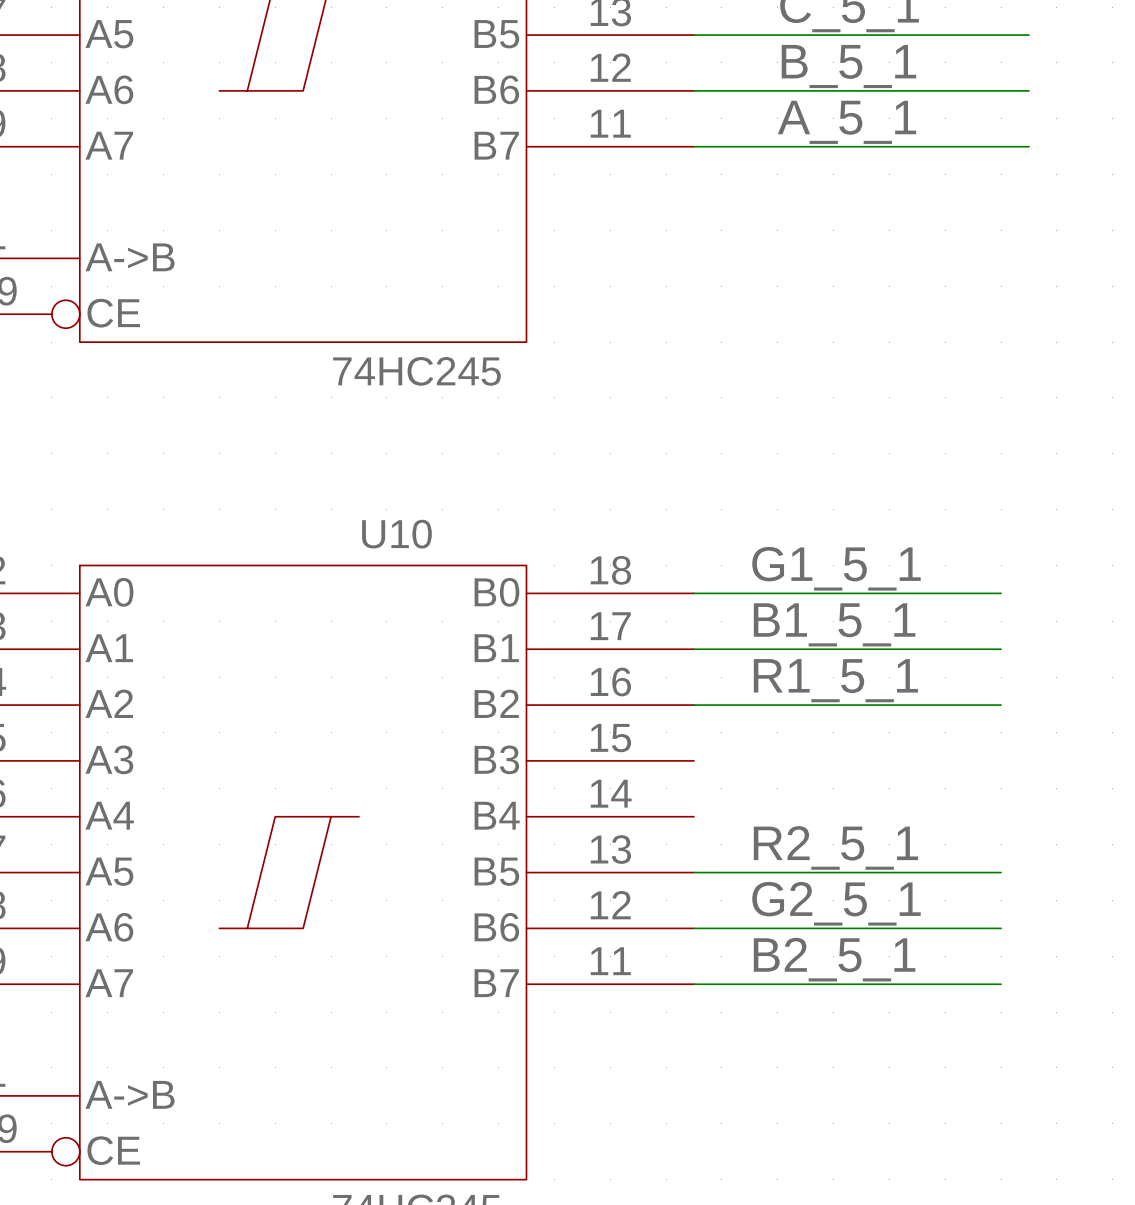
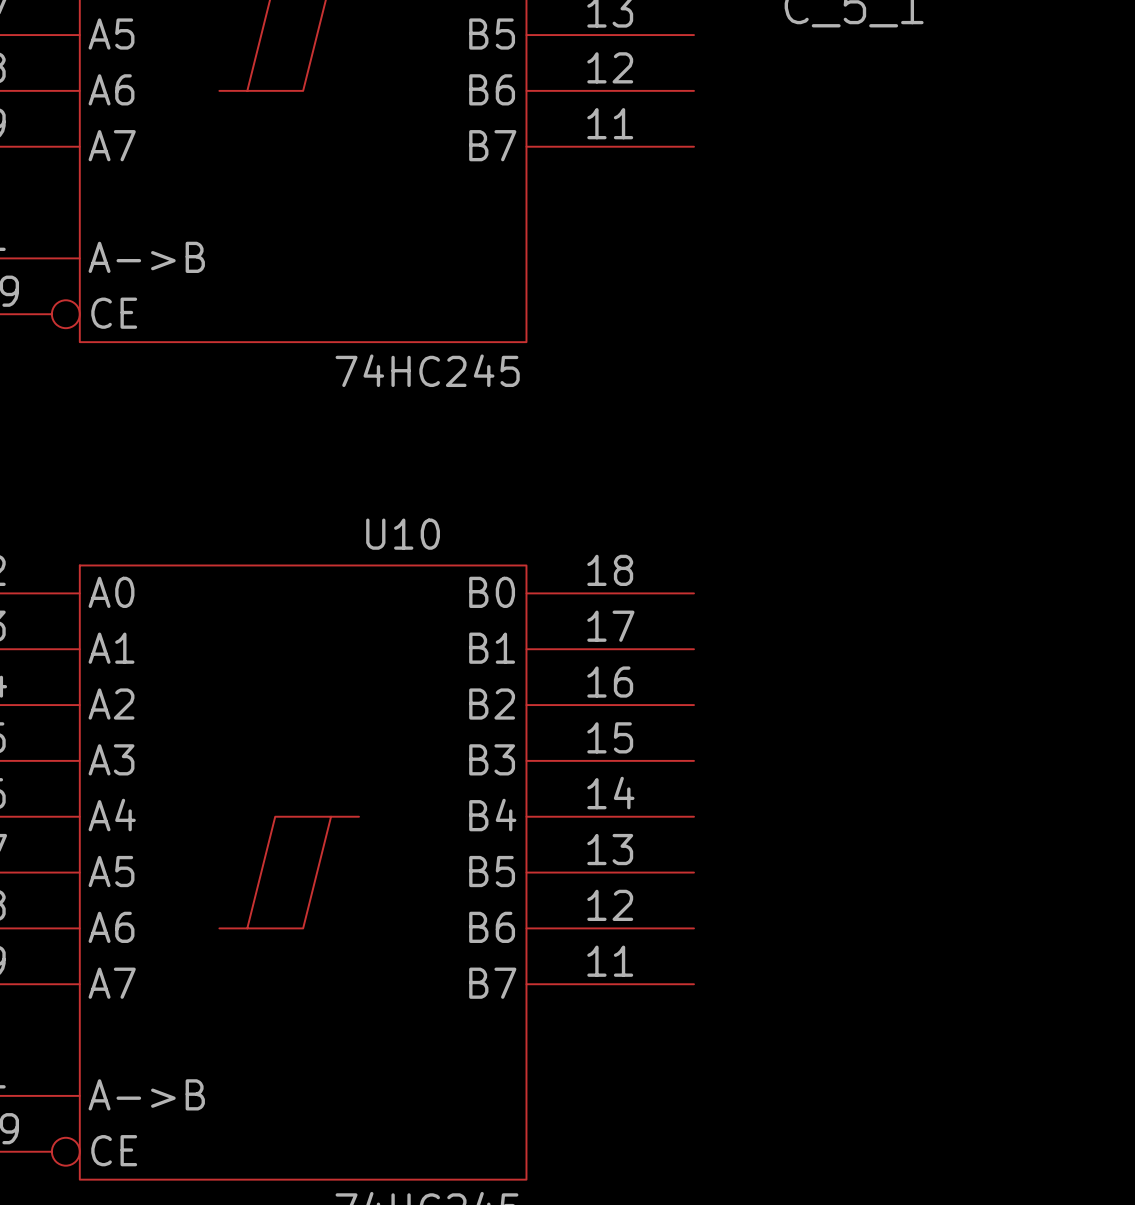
wire: (693, 35) (1028, 35) -> none
label: B_5_1 (848, 66) -> none
wire: (693, 90) (1028, 90) -> none
label: A_5_1 (846, 122) -> none
wire: (693, 146) (1028, 146) -> none
label: G1_5_1 (836, 568) -> none
wire: (693, 593) (1001, 593) -> none
label: B1_5_1 (834, 624) -> none
wire: (693, 649) (1001, 649) -> none
label: R1_5_1 (835, 680) -> none
wire: (693, 705) (1001, 705) -> none
label: R2_5_1 (835, 847) -> none
wire: (693, 872) (1001, 872) -> none
label: G2_5_1 (836, 903) -> none
wire: (693, 928) (1001, 928) -> none
label: B2_5_1 (834, 959) -> none
wire: (693, 984) (1001, 984) -> none

